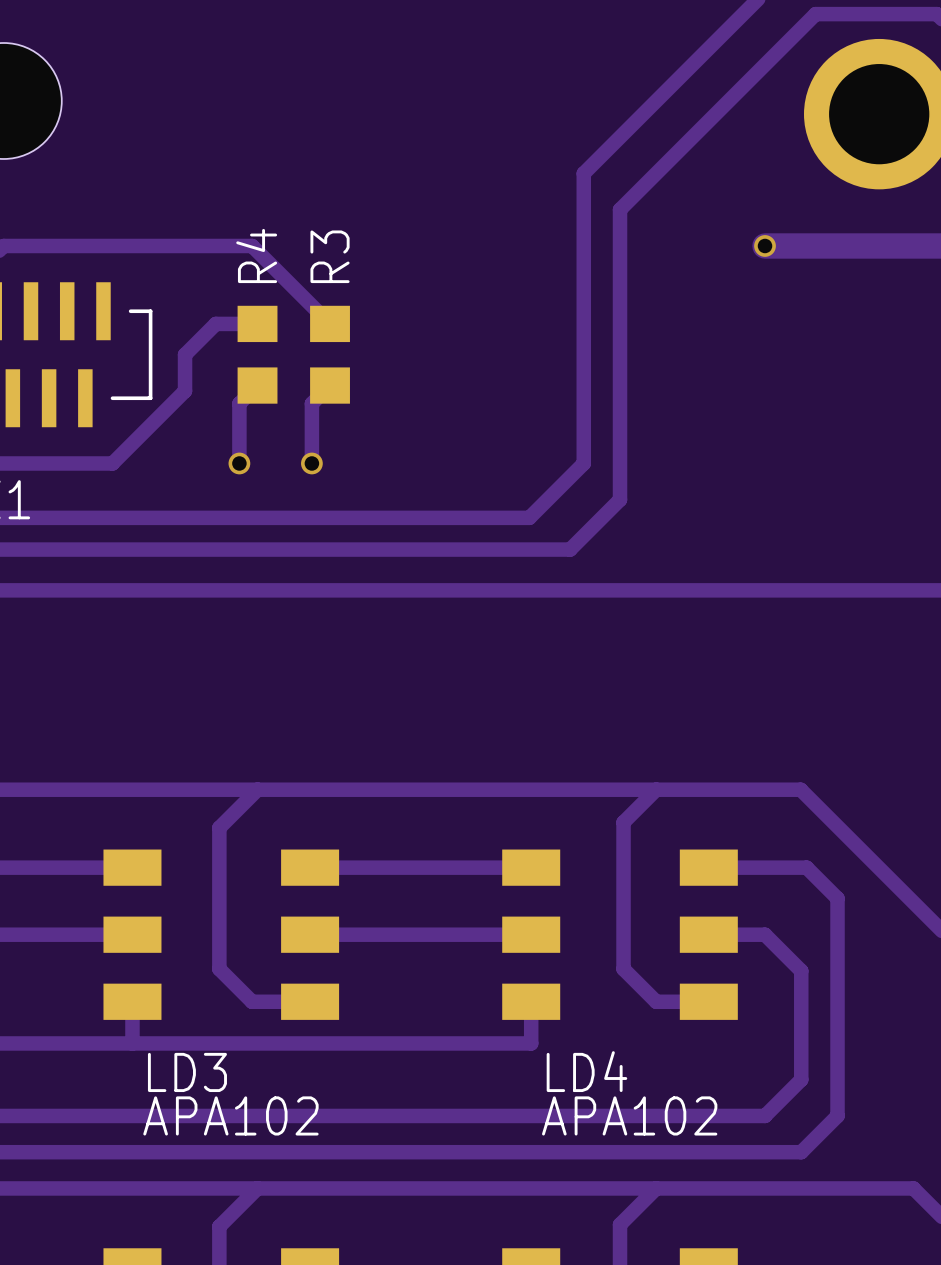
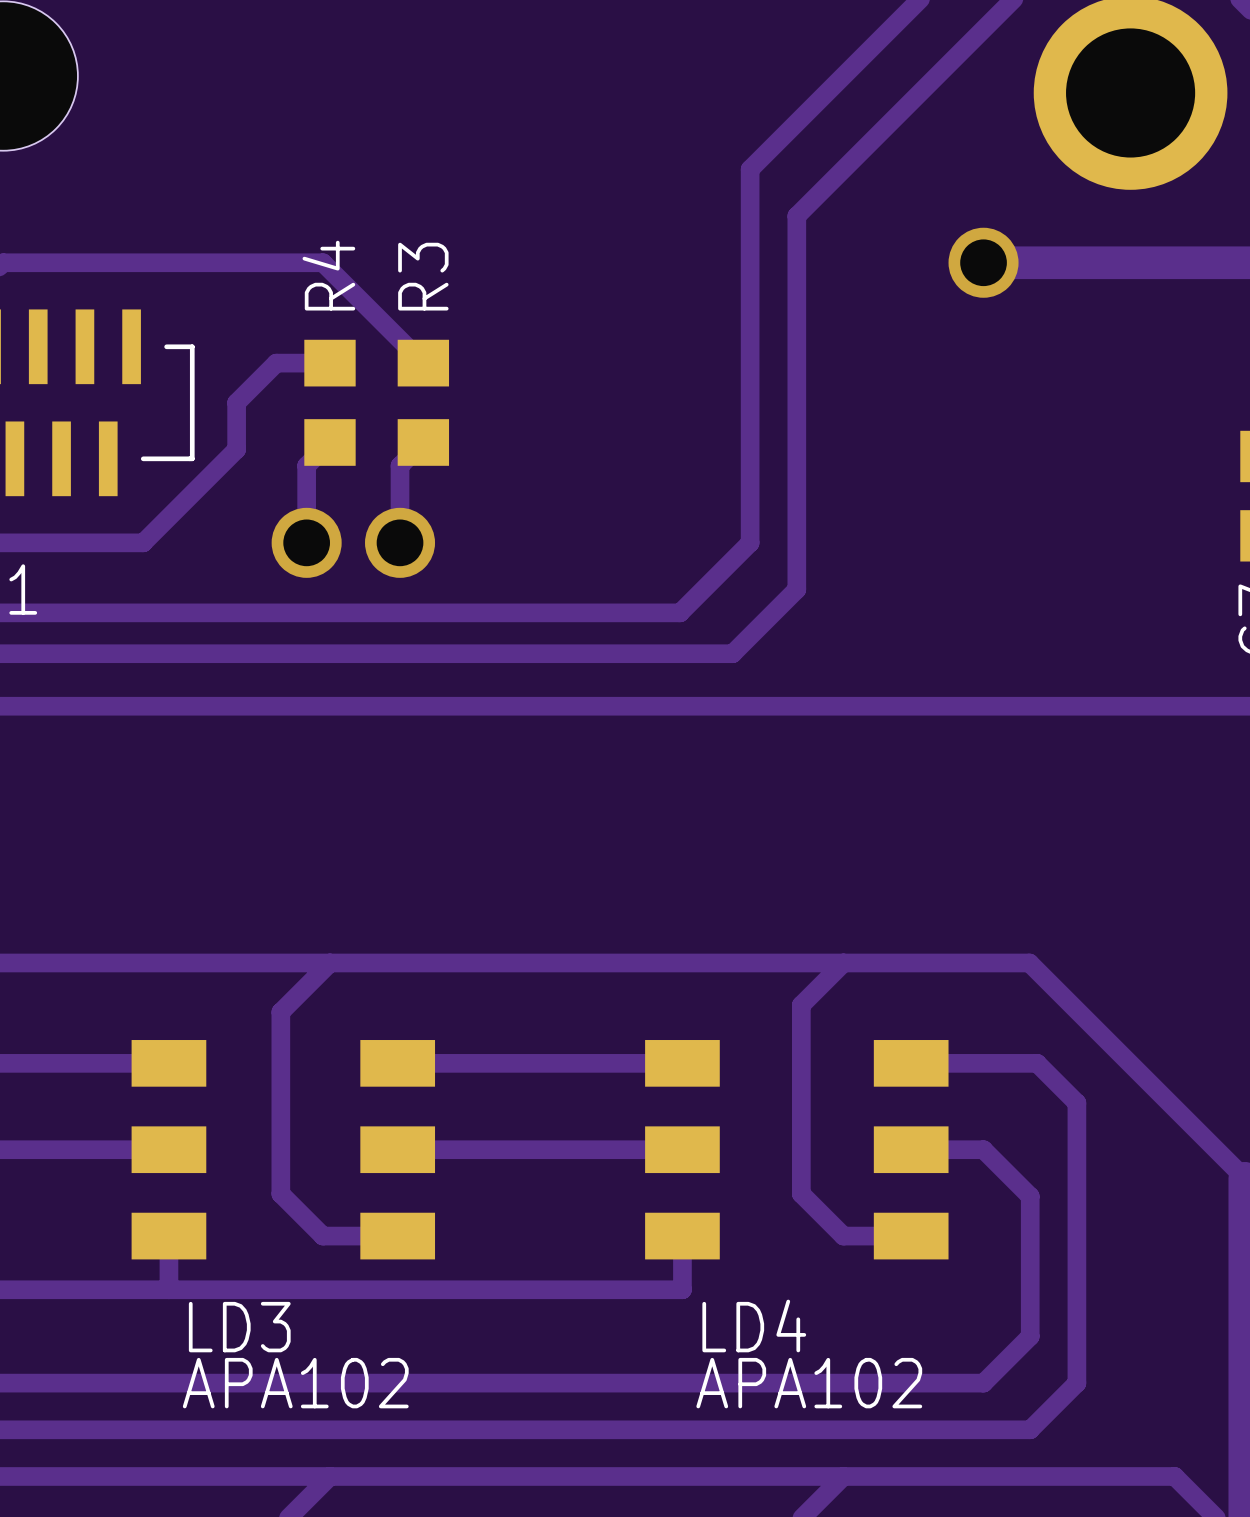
via size: [754, 235, 776, 257] -> [948, 227, 1019, 298]
via size: [228, 452, 251, 475] -> [271, 507, 342, 578]
via size: [301, 452, 323, 475] -> [365, 507, 436, 578]

